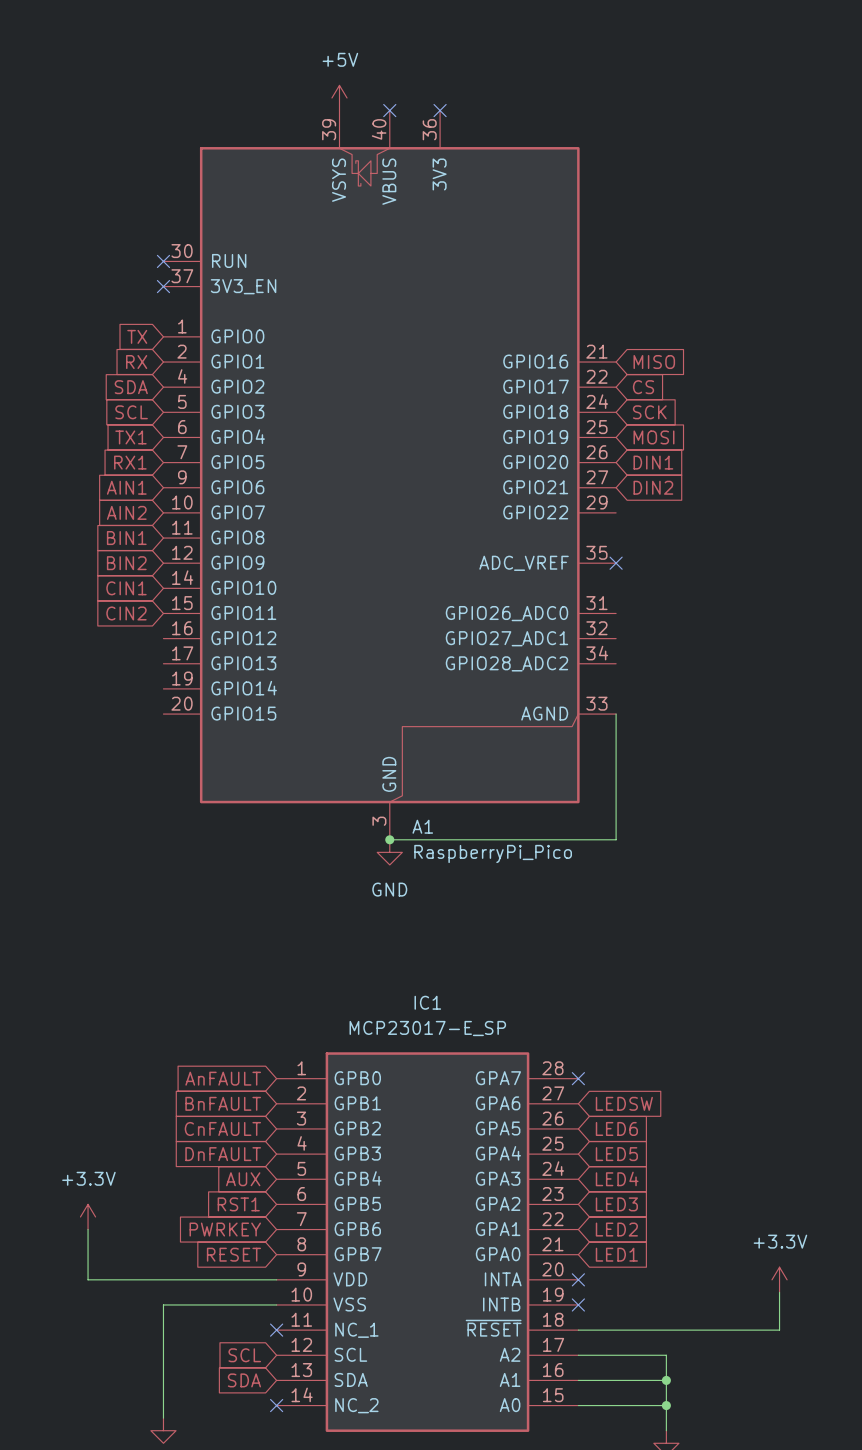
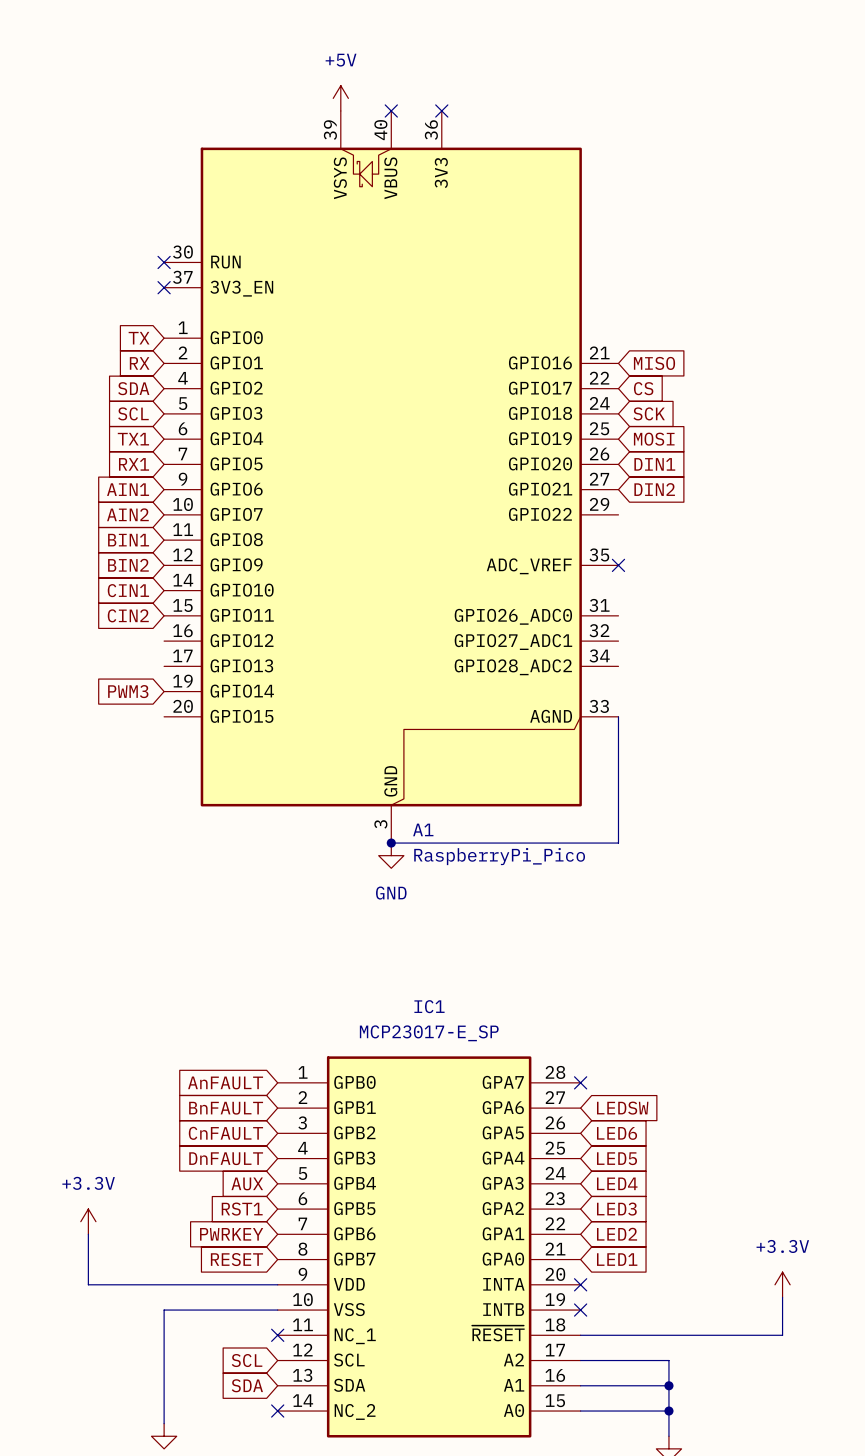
global label: none -> PWM3 (128, 691)

